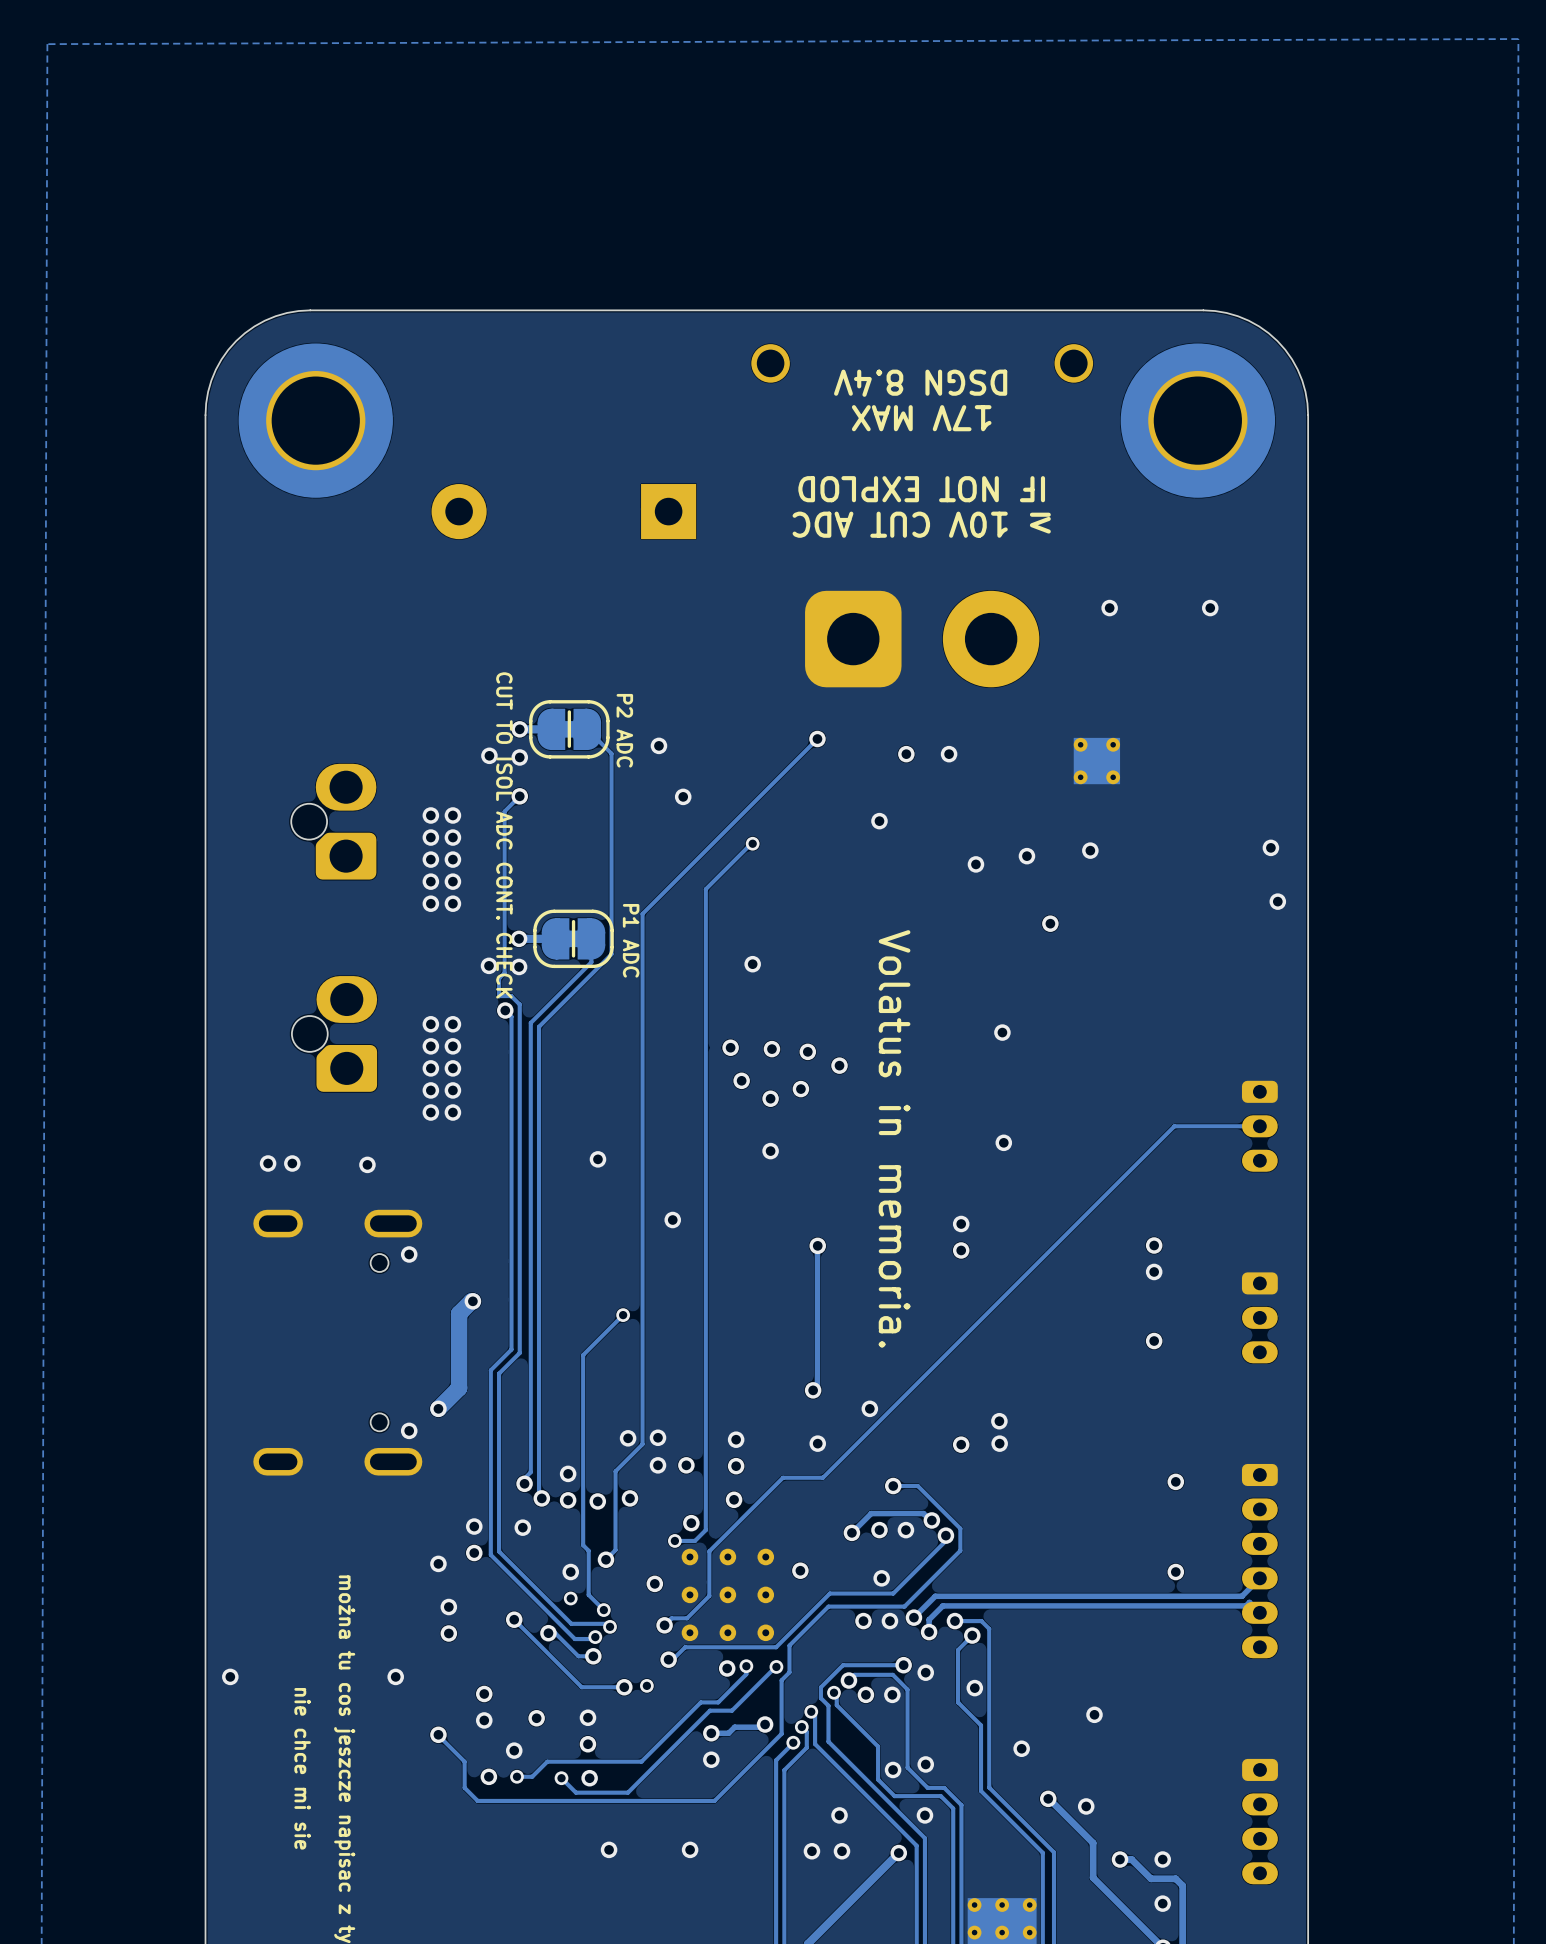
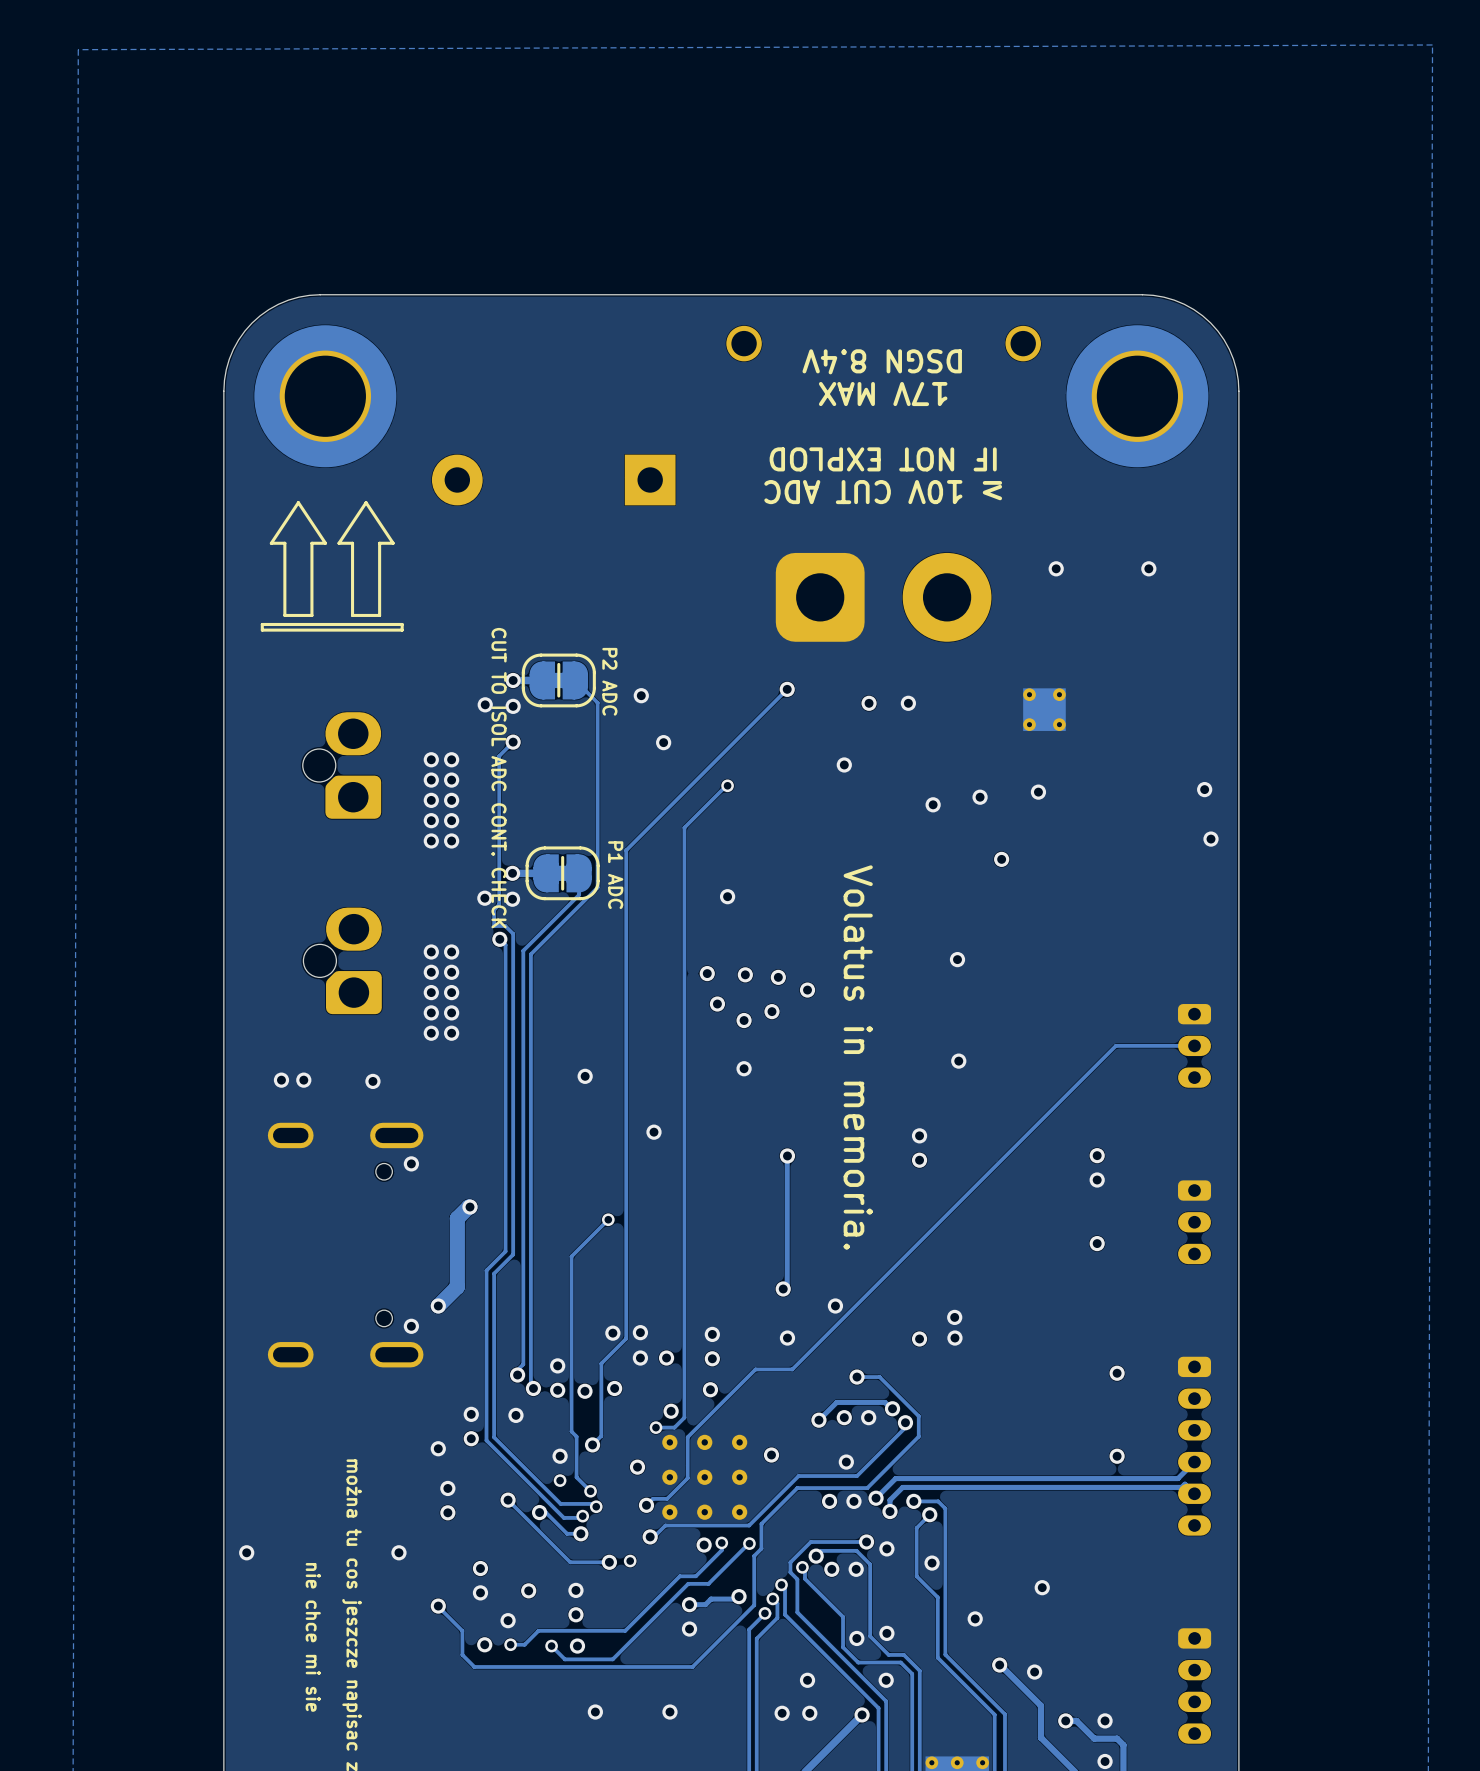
line: none -> (298, 502) (325, 543) (311, 543) (311, 615) (284, 615) (284, 543) (271, 543) (298, 502)
line: none -> (366, 502) (393, 543) (379, 543) (379, 615) (352, 615) (352, 543) (339, 543) (366, 502)
line: none -> (402, 624) (402, 630) (262, 630) (262, 624) (402, 624)

